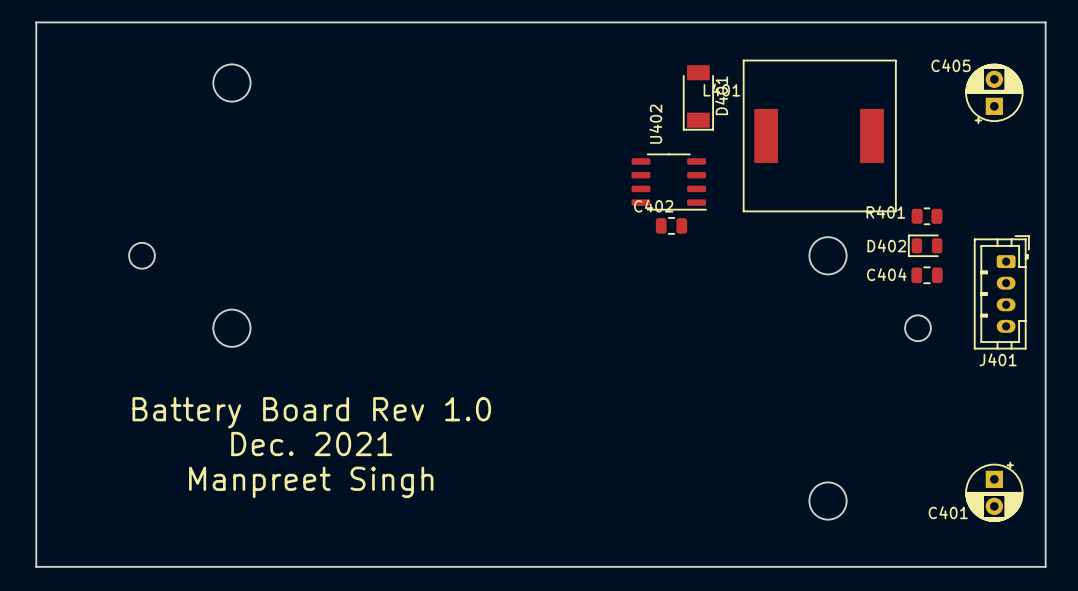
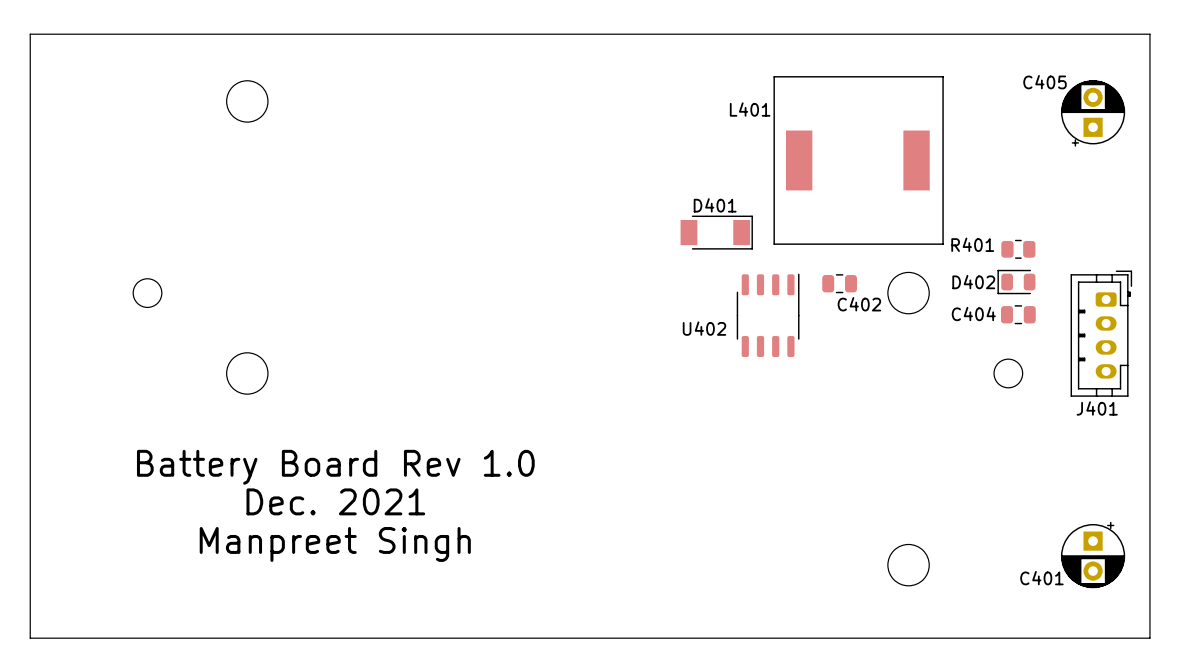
D401 rotation: 0° (698, 97) -> 90° counterclockwise (716, 232)
D401 position: (698, 97) -> (716, 232)
L401 position: (819, 135) -> (858, 160)
U402 rotation: 0° (669, 182) -> 90° counterclockwise (768, 315)
U402 position: (669, 182) -> (768, 315)
C402 name position: C402 (653, 206) -> C402 (859, 304)
C402 position: (671, 225) -> (839, 283)

